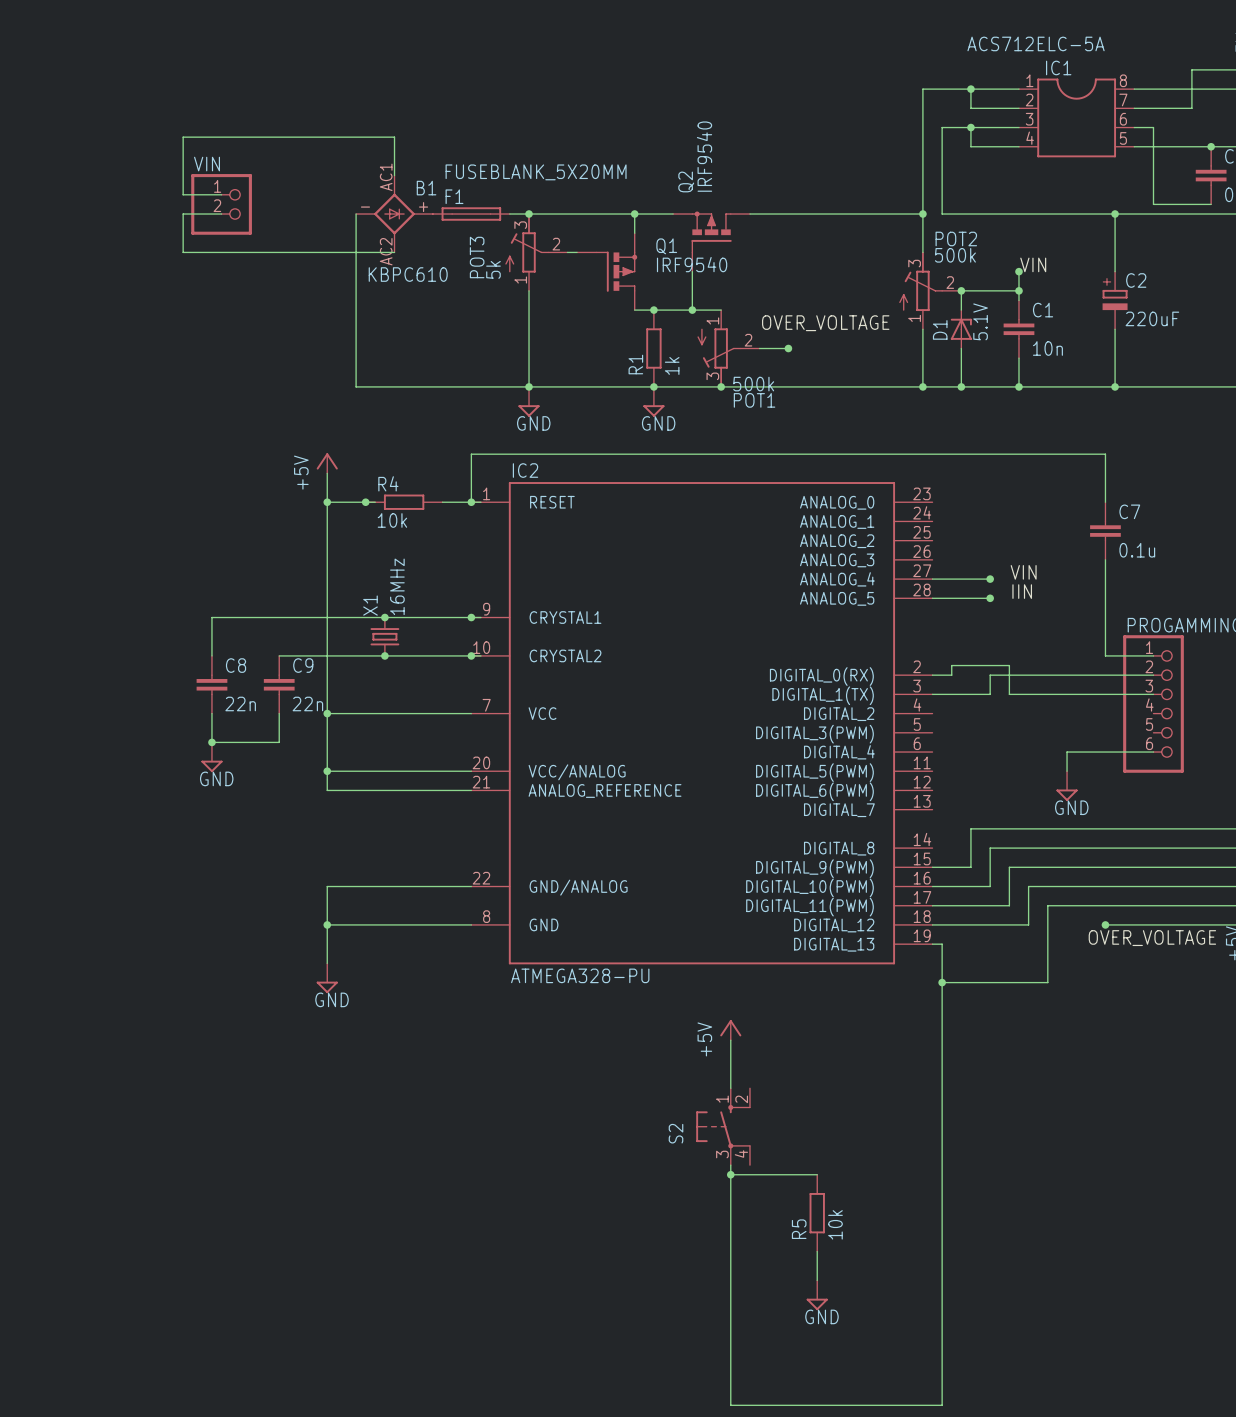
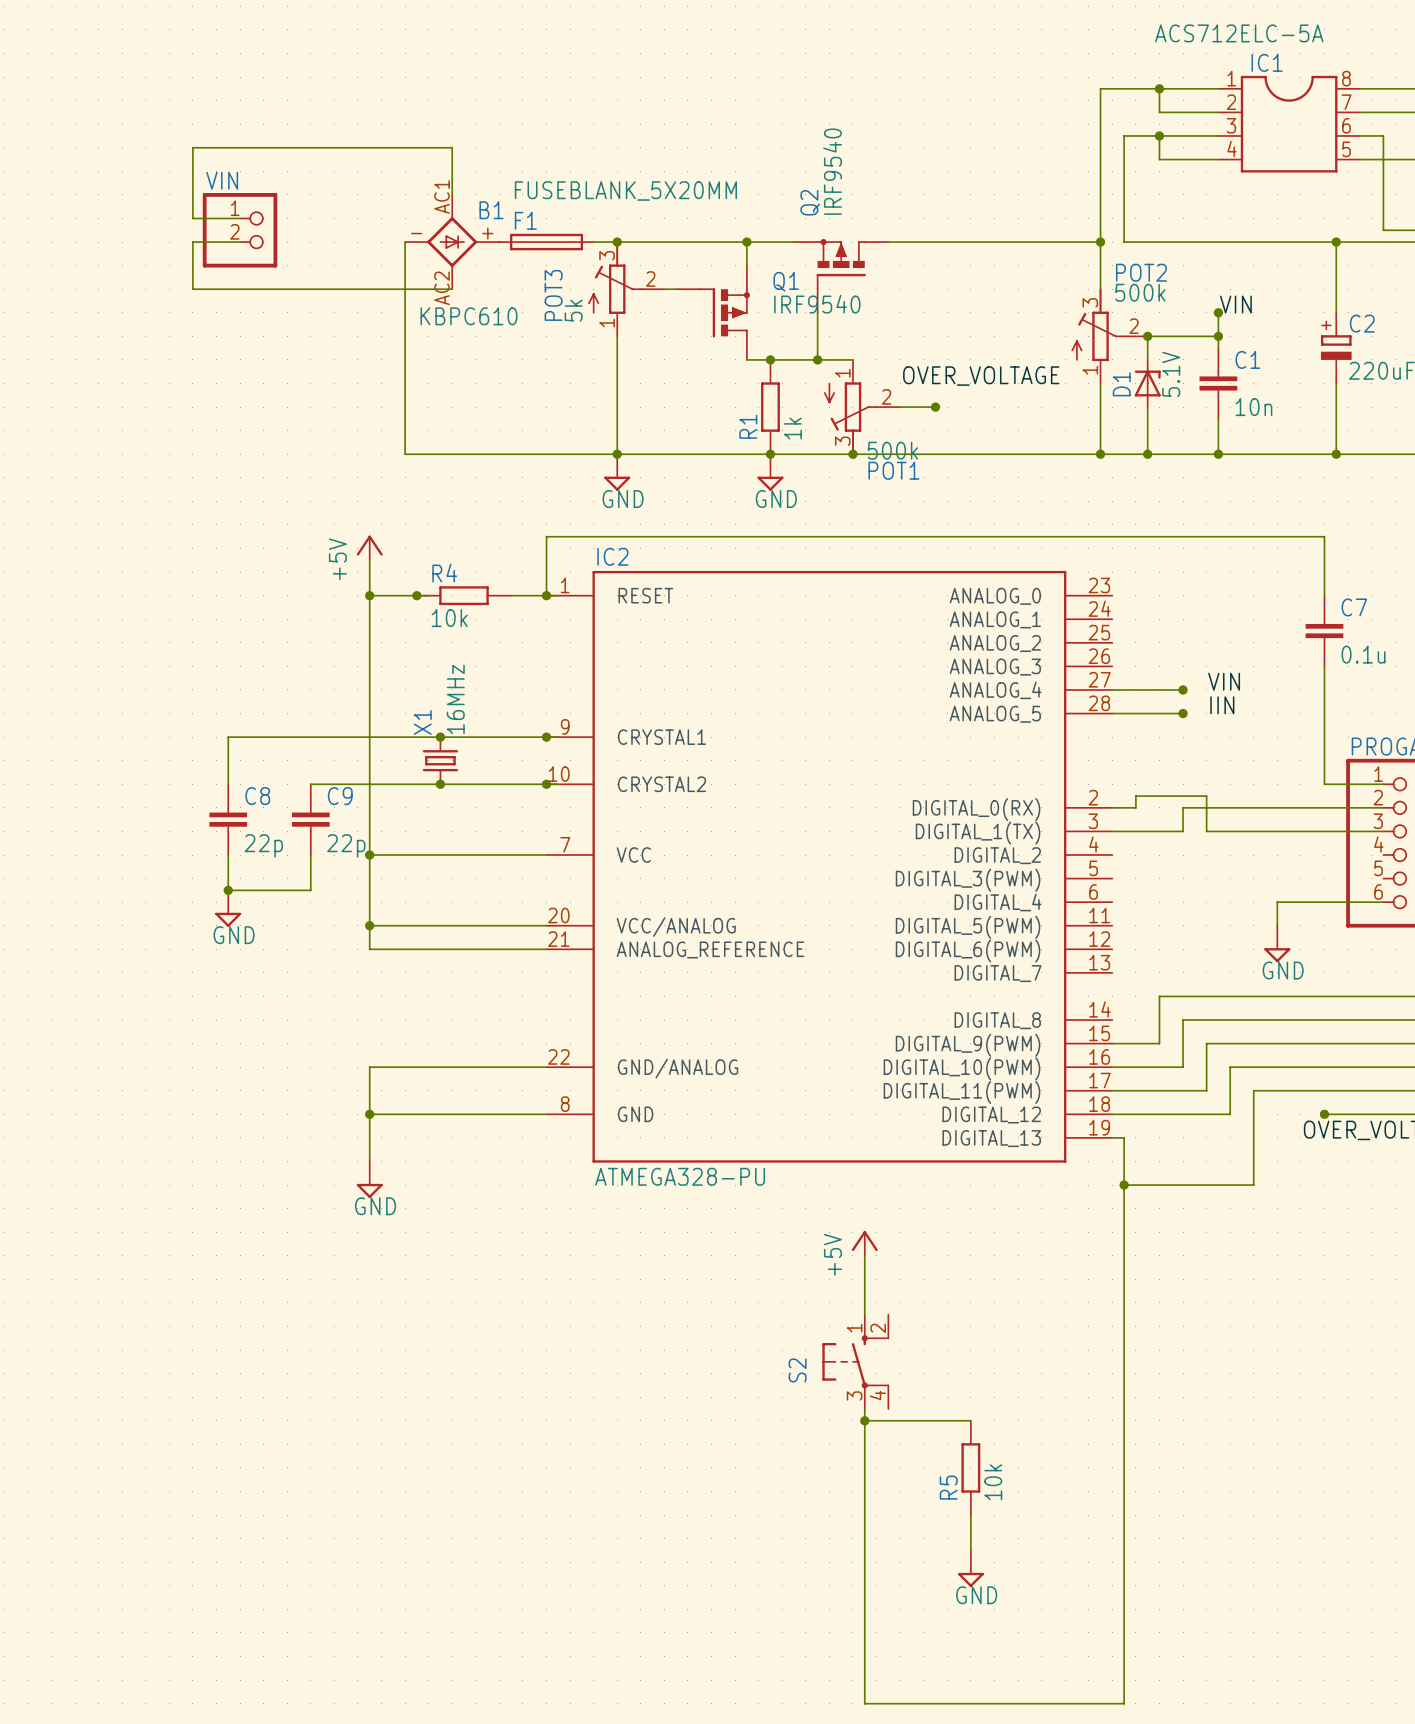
C8 value: 22n (240, 703) -> 22p (263, 845)
C9 value: 22n (307, 703) -> 22p (346, 845)

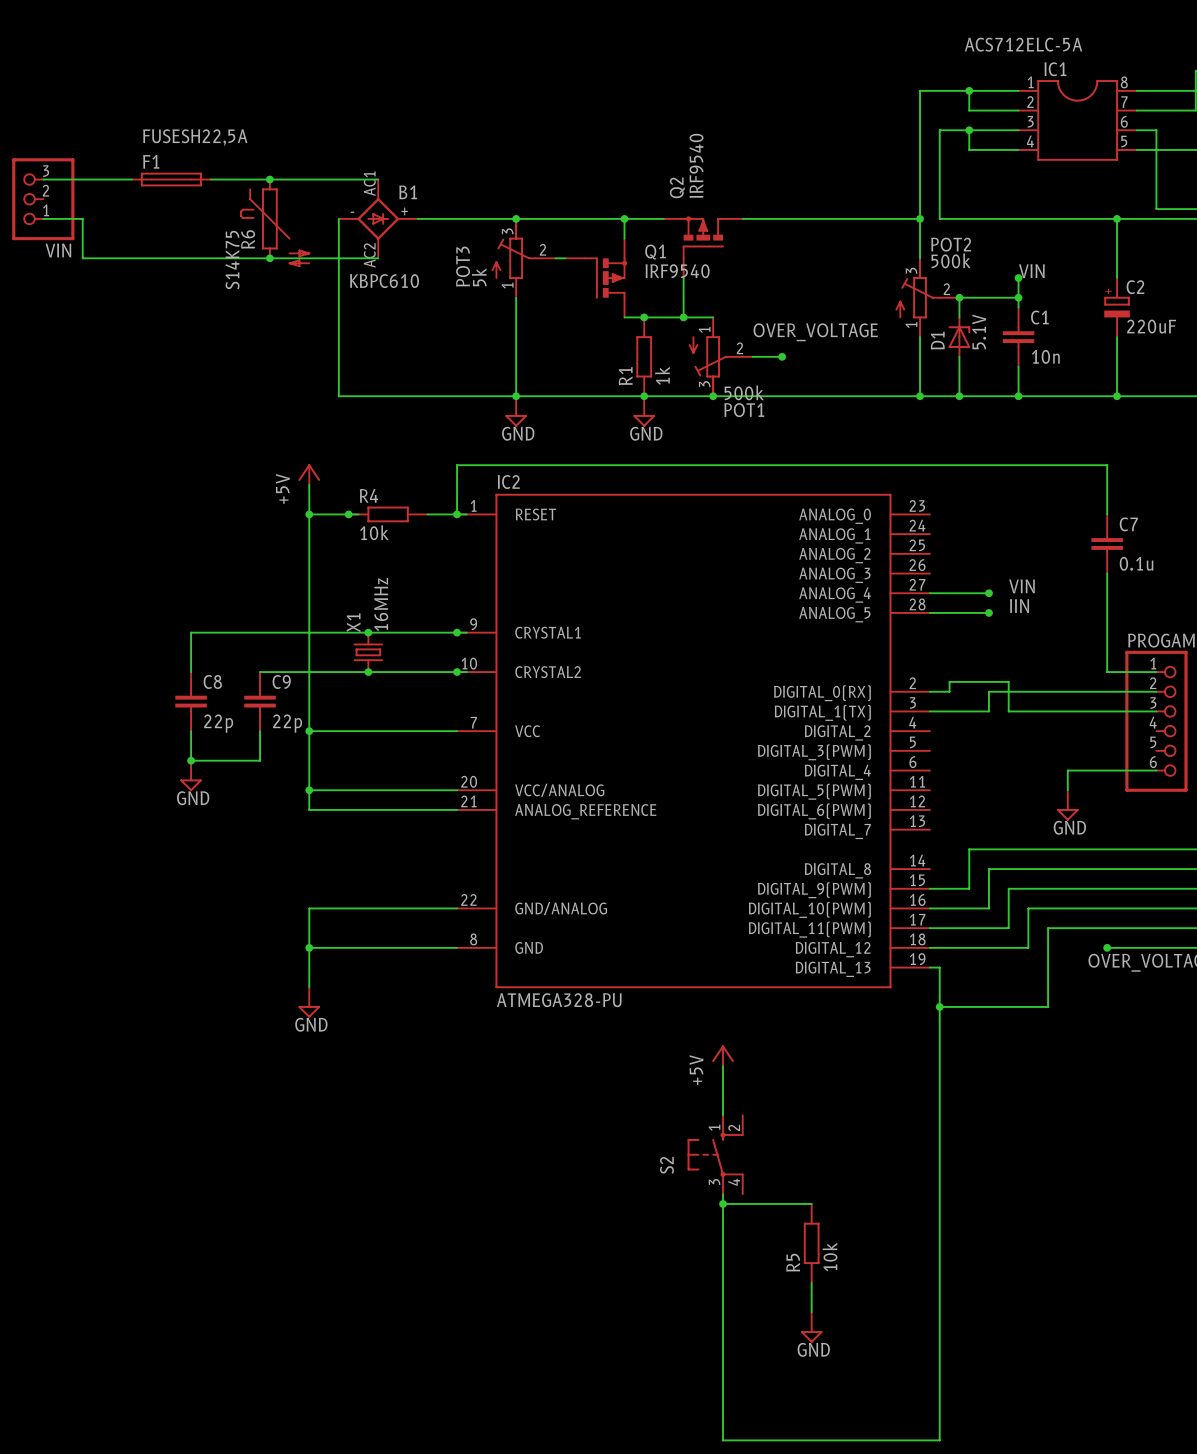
F1 value: FUSEBLANK_5X20MM (625, 190) -> FUSESH22,5A (195, 137)
wire: none -> (43, 179) (131, 179)
junction: none -> (269, 179)
wire: (452, 194) (452, 147) (192, 147) (192, 218) (240, 218) -> (378, 179) (210, 179)
VIN: none -> (43, 199)
VIN: (240, 230) -> none
wire: (240, 242) (192, 242) (192, 289) -> (43, 218) (82, 218) (82, 258) (161, 258)
F1 position: (546, 242) -> (171, 179)
R6: none -> S14K75 (275, 222)
junction: none -> (269, 258)

